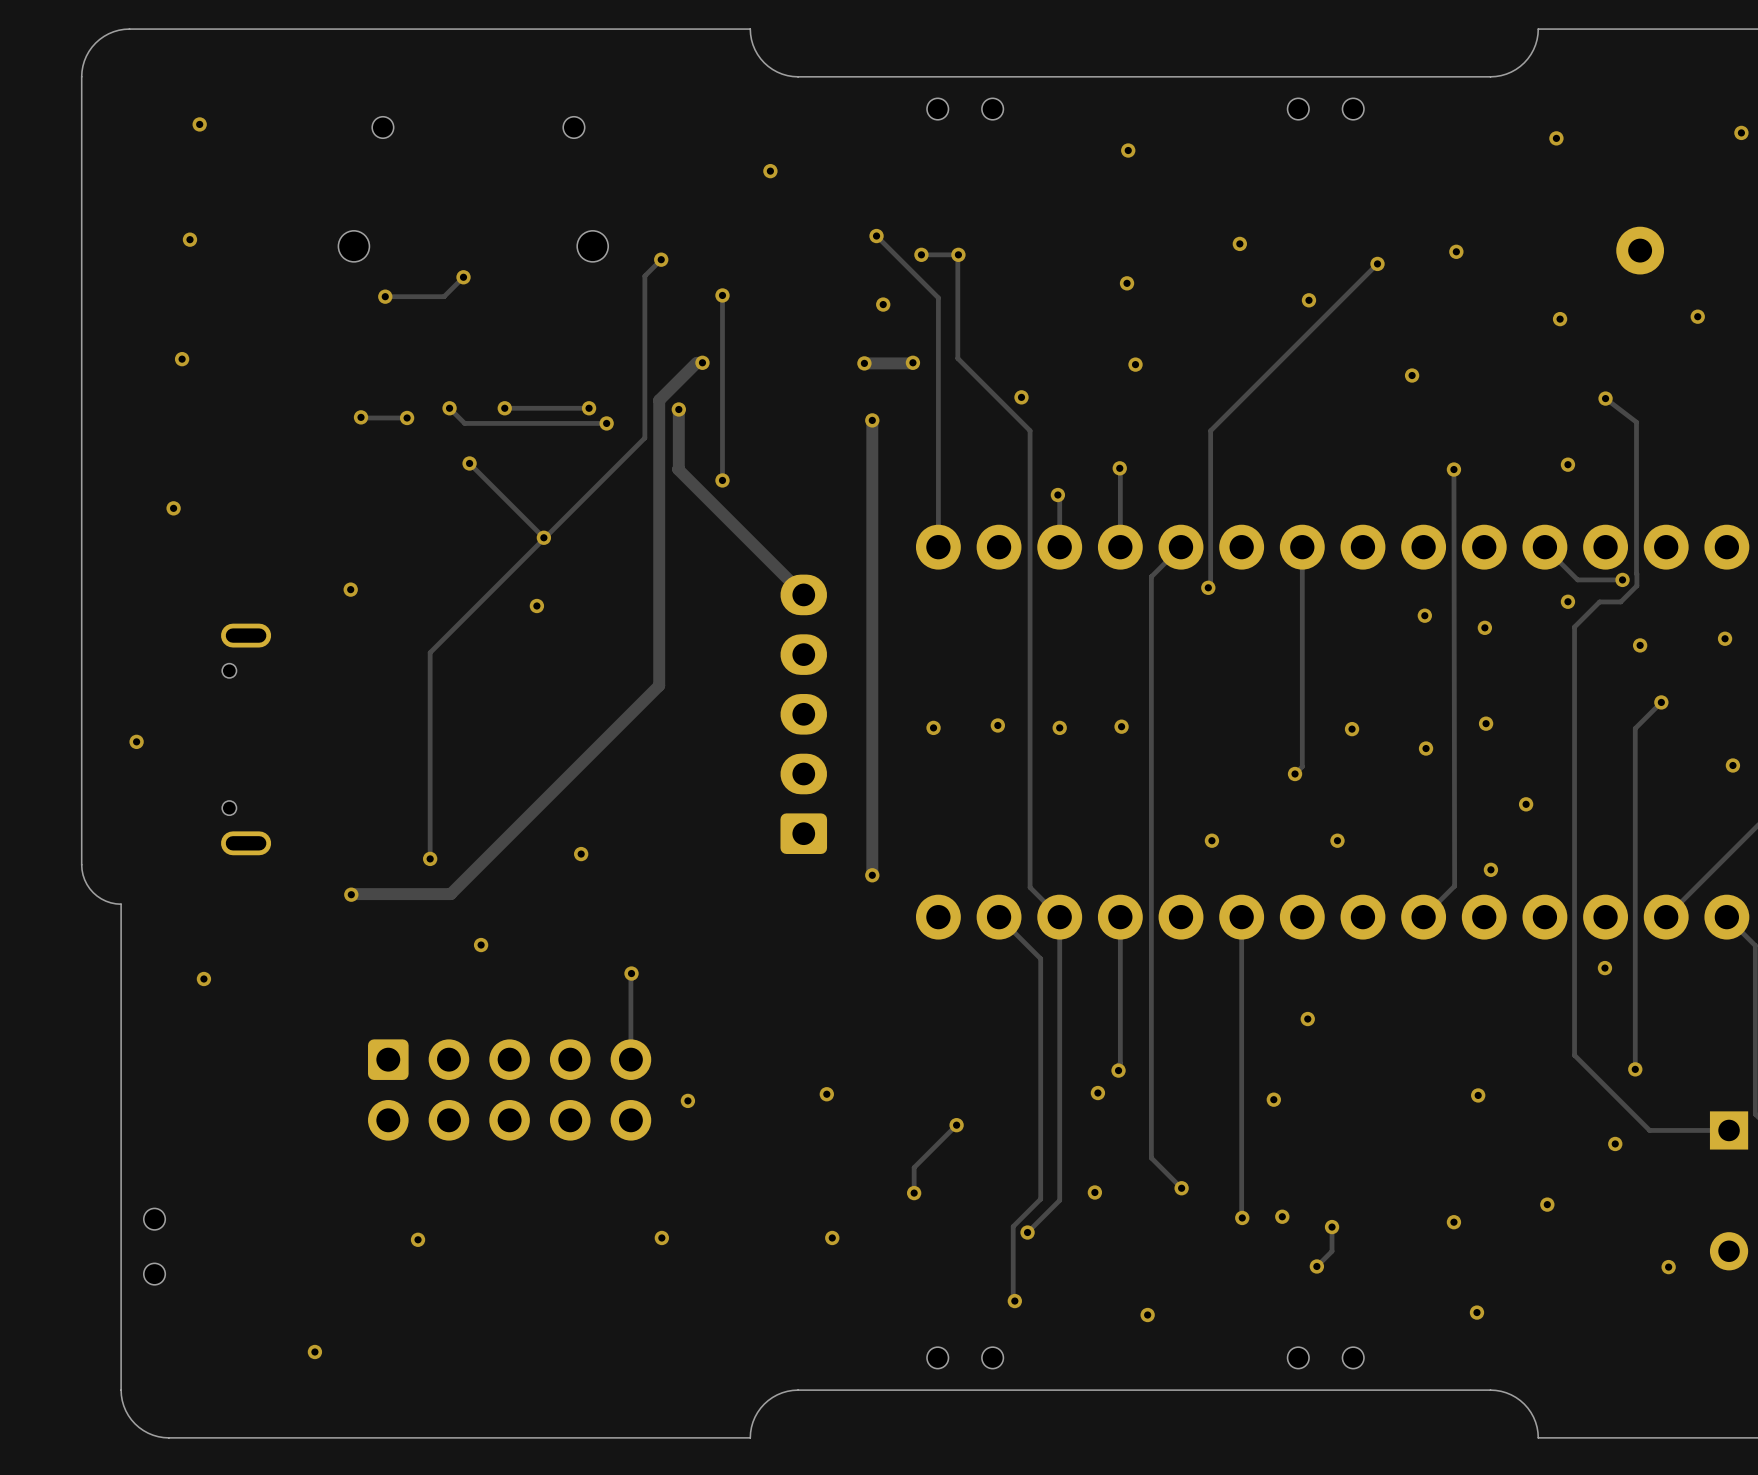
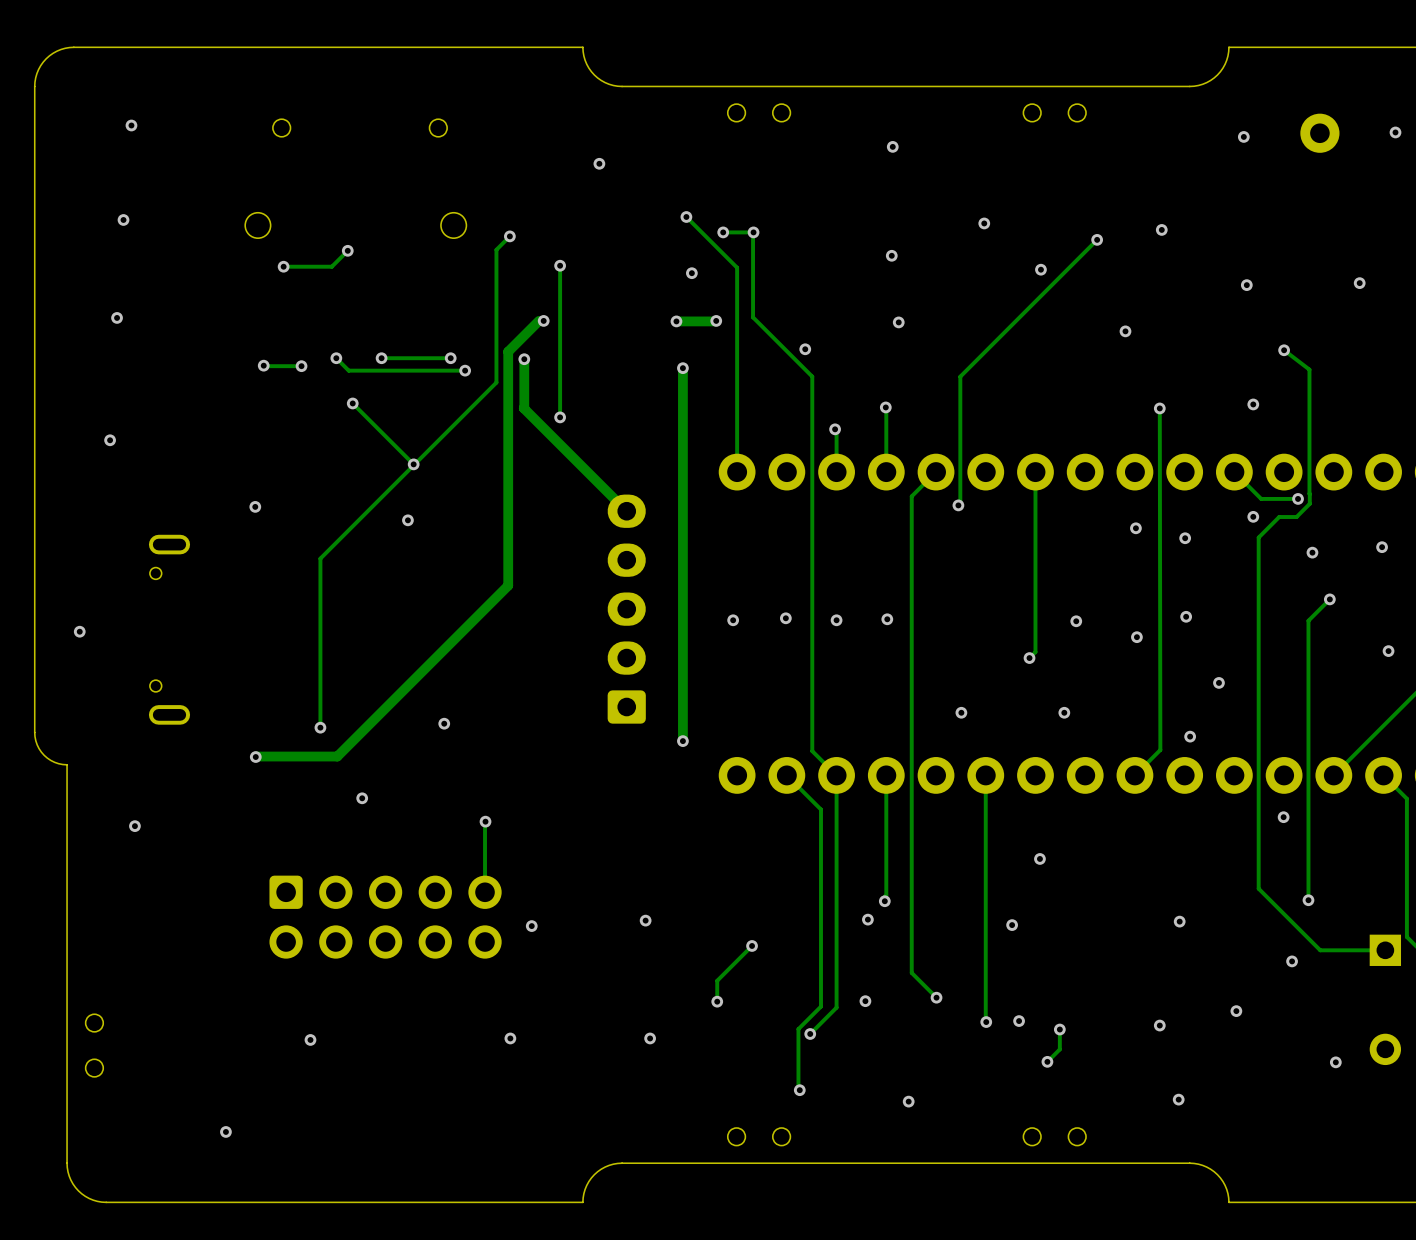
part position: (1640, 250) -> (1319, 133)

